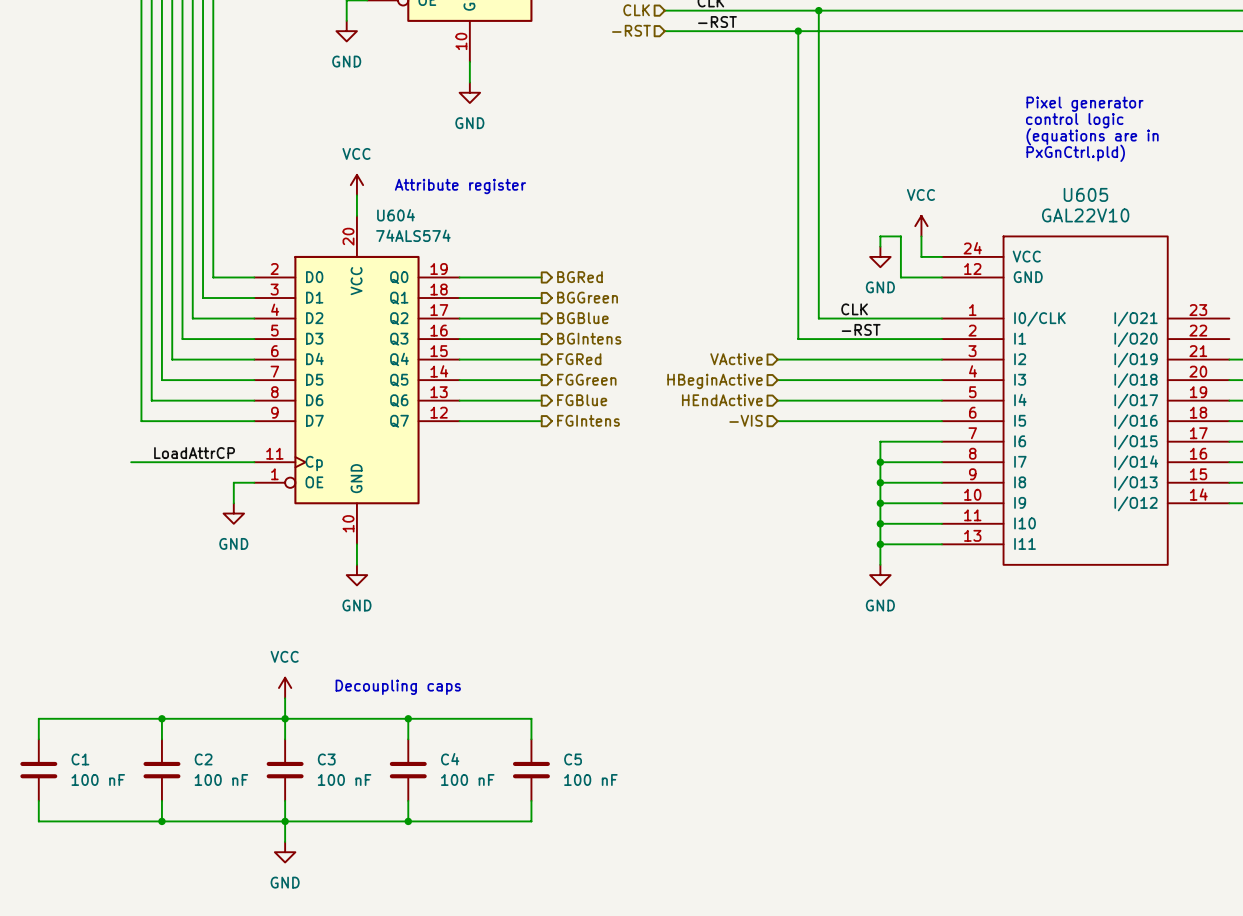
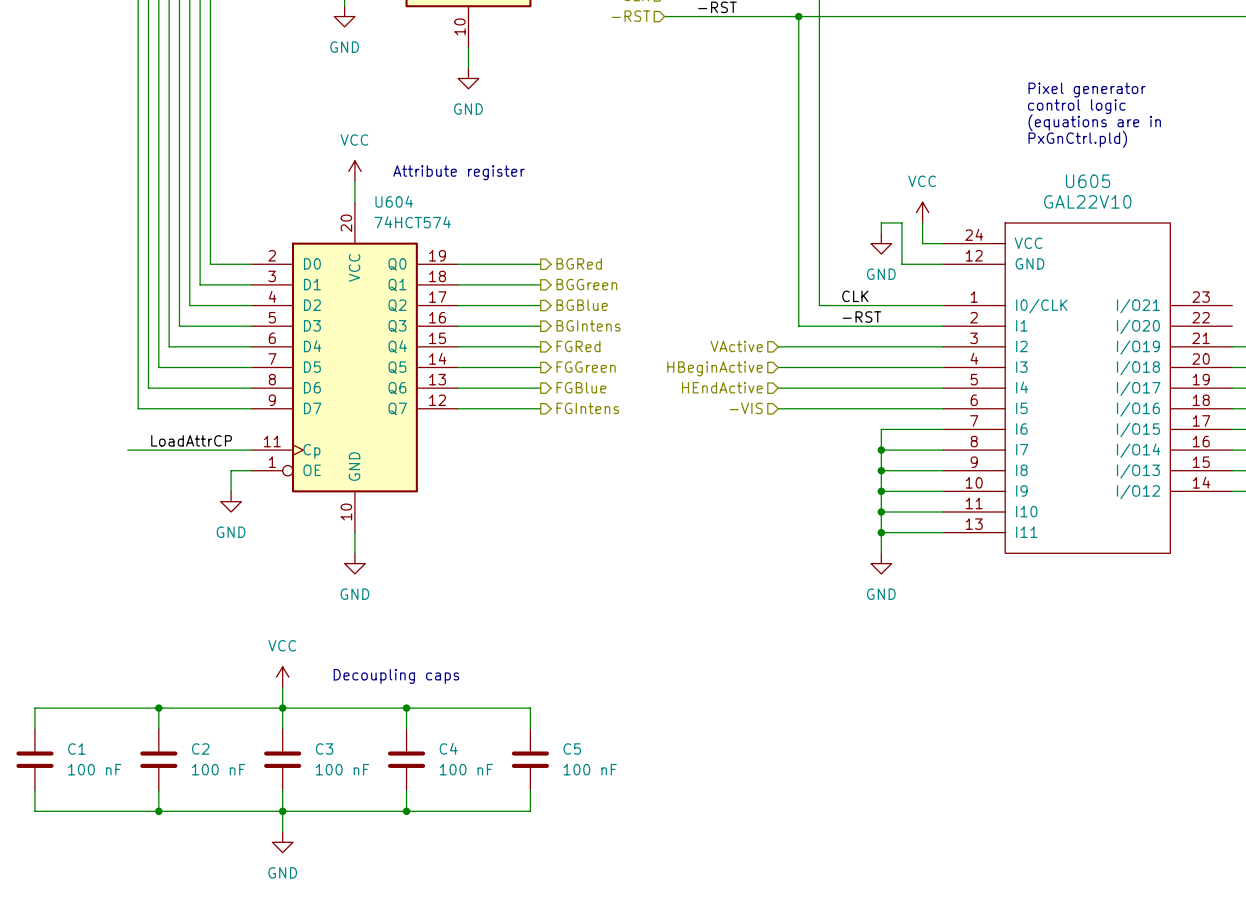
U604 value: 74ALS574 (413, 235) -> 74HCT574 (412, 222)

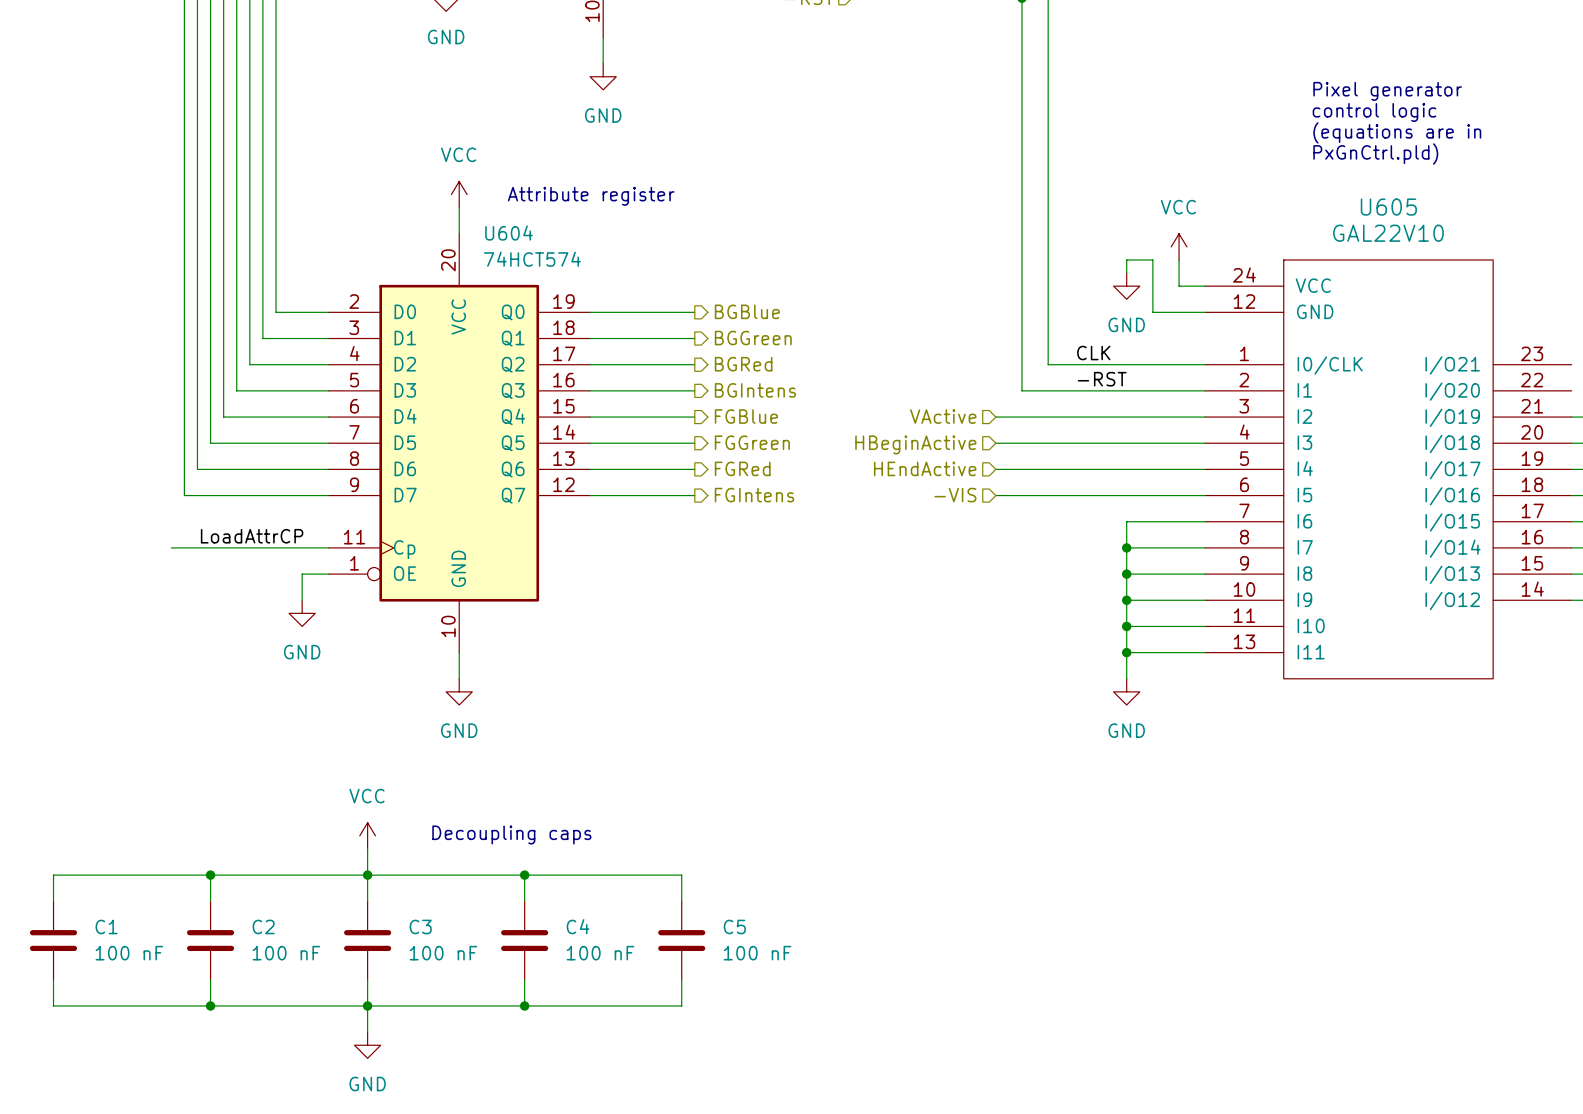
hierarchical label: BGRed (579, 263) -> BGBlue (747, 311)
hierarchical label: BGBlue (582, 305) -> BGRed (743, 364)
hierarchical label: FGRed (578, 346) -> FGBlue (746, 416)
hierarchical label: FGBlue (581, 387) -> FGRed (742, 468)

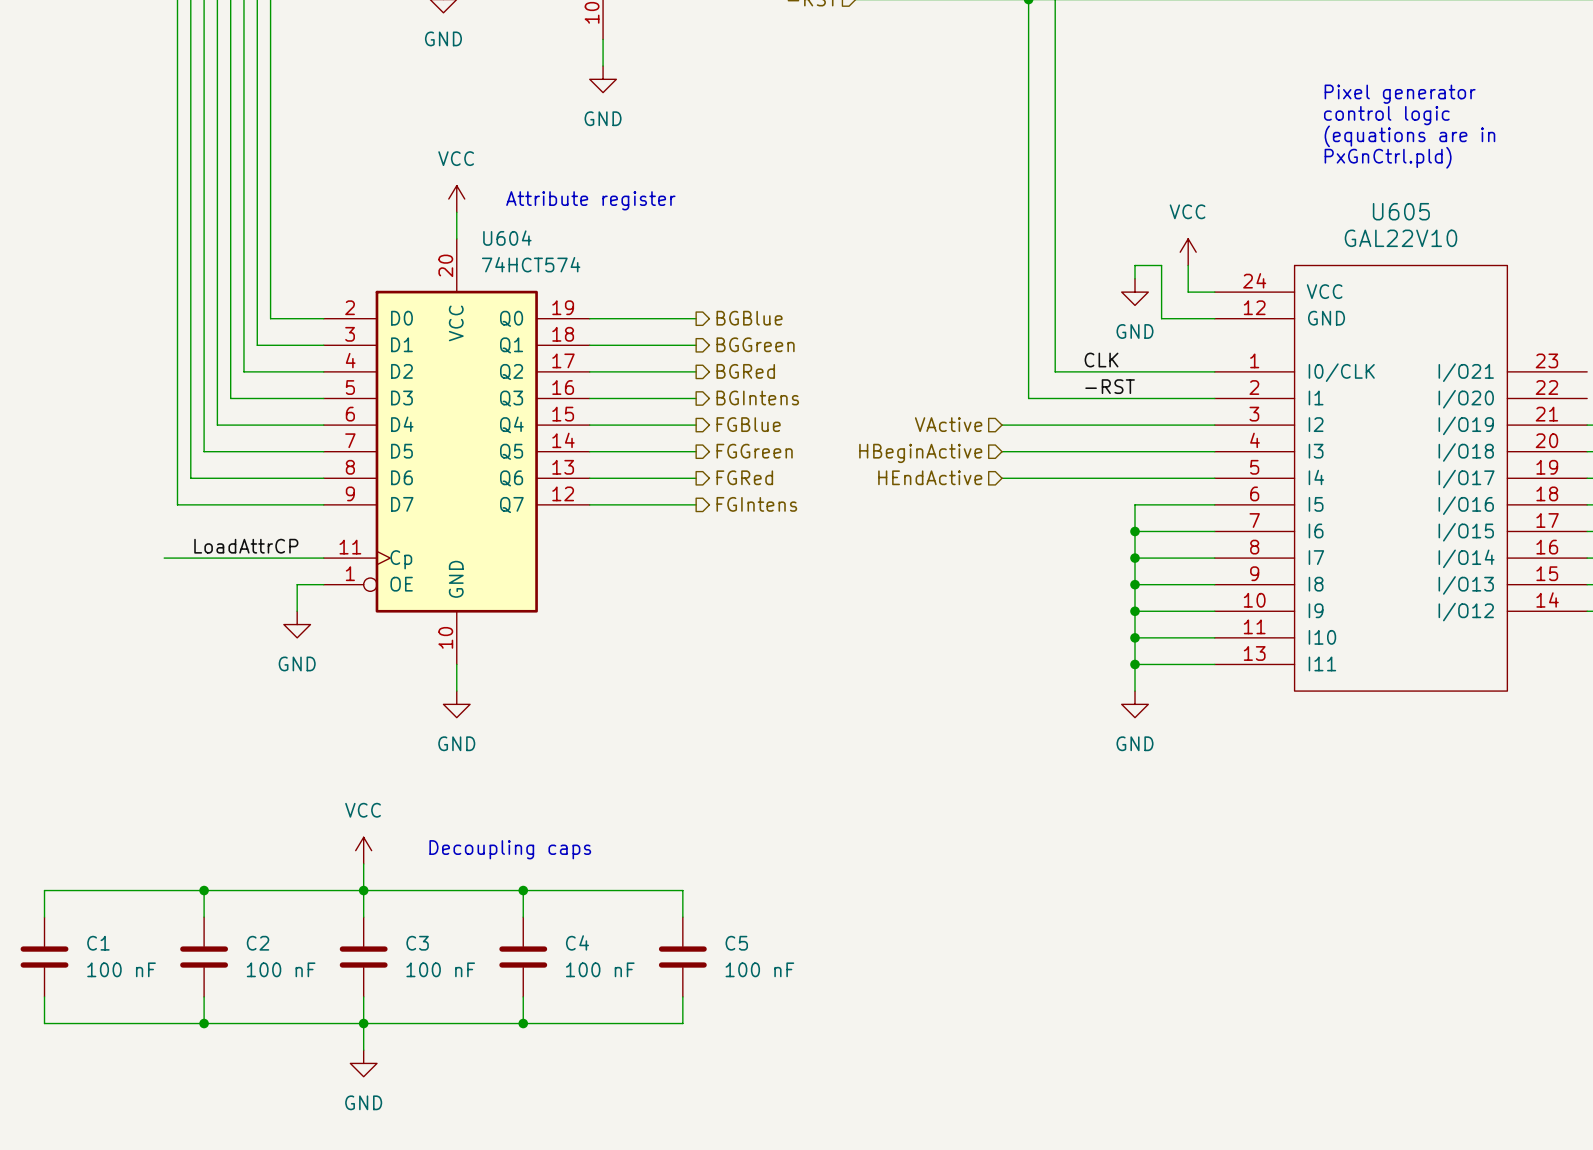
hierarchical label: -VIS (955, 495) -> none
wire: (995, 495) (1126, 495) -> (1135, 531) (1135, 504)
junction: none -> (1135, 531)

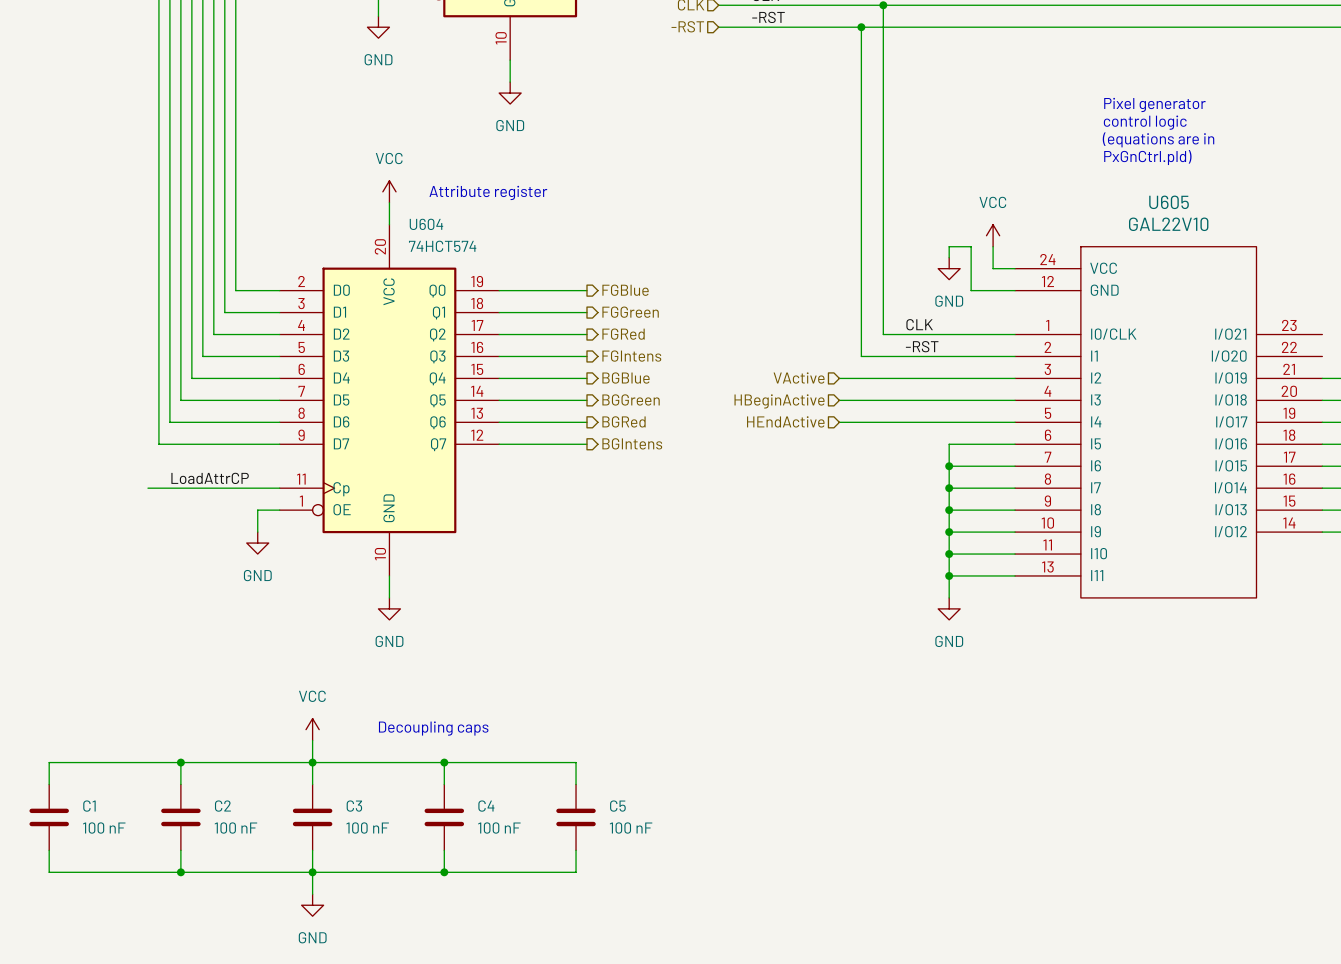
hierarchical label: BGBlue (749, 318) -> FGBlue (625, 290)
hierarchical label: BGGreen (755, 344) -> FGGreen (630, 312)
hierarchical label: BGRed (745, 371) -> FGRed (623, 334)
hierarchical label: BGIntens (757, 397) -> FGIntens (631, 356)
hierarchical label: FGBlue (748, 424) -> BGBlue (626, 378)
hierarchical label: FGGreen (754, 451) -> BGGreen (631, 399)
hierarchical label: FGRed (744, 477) -> BGRed (624, 421)
hierarchical label: FGIntens (756, 504) -> BGIntens (632, 443)

